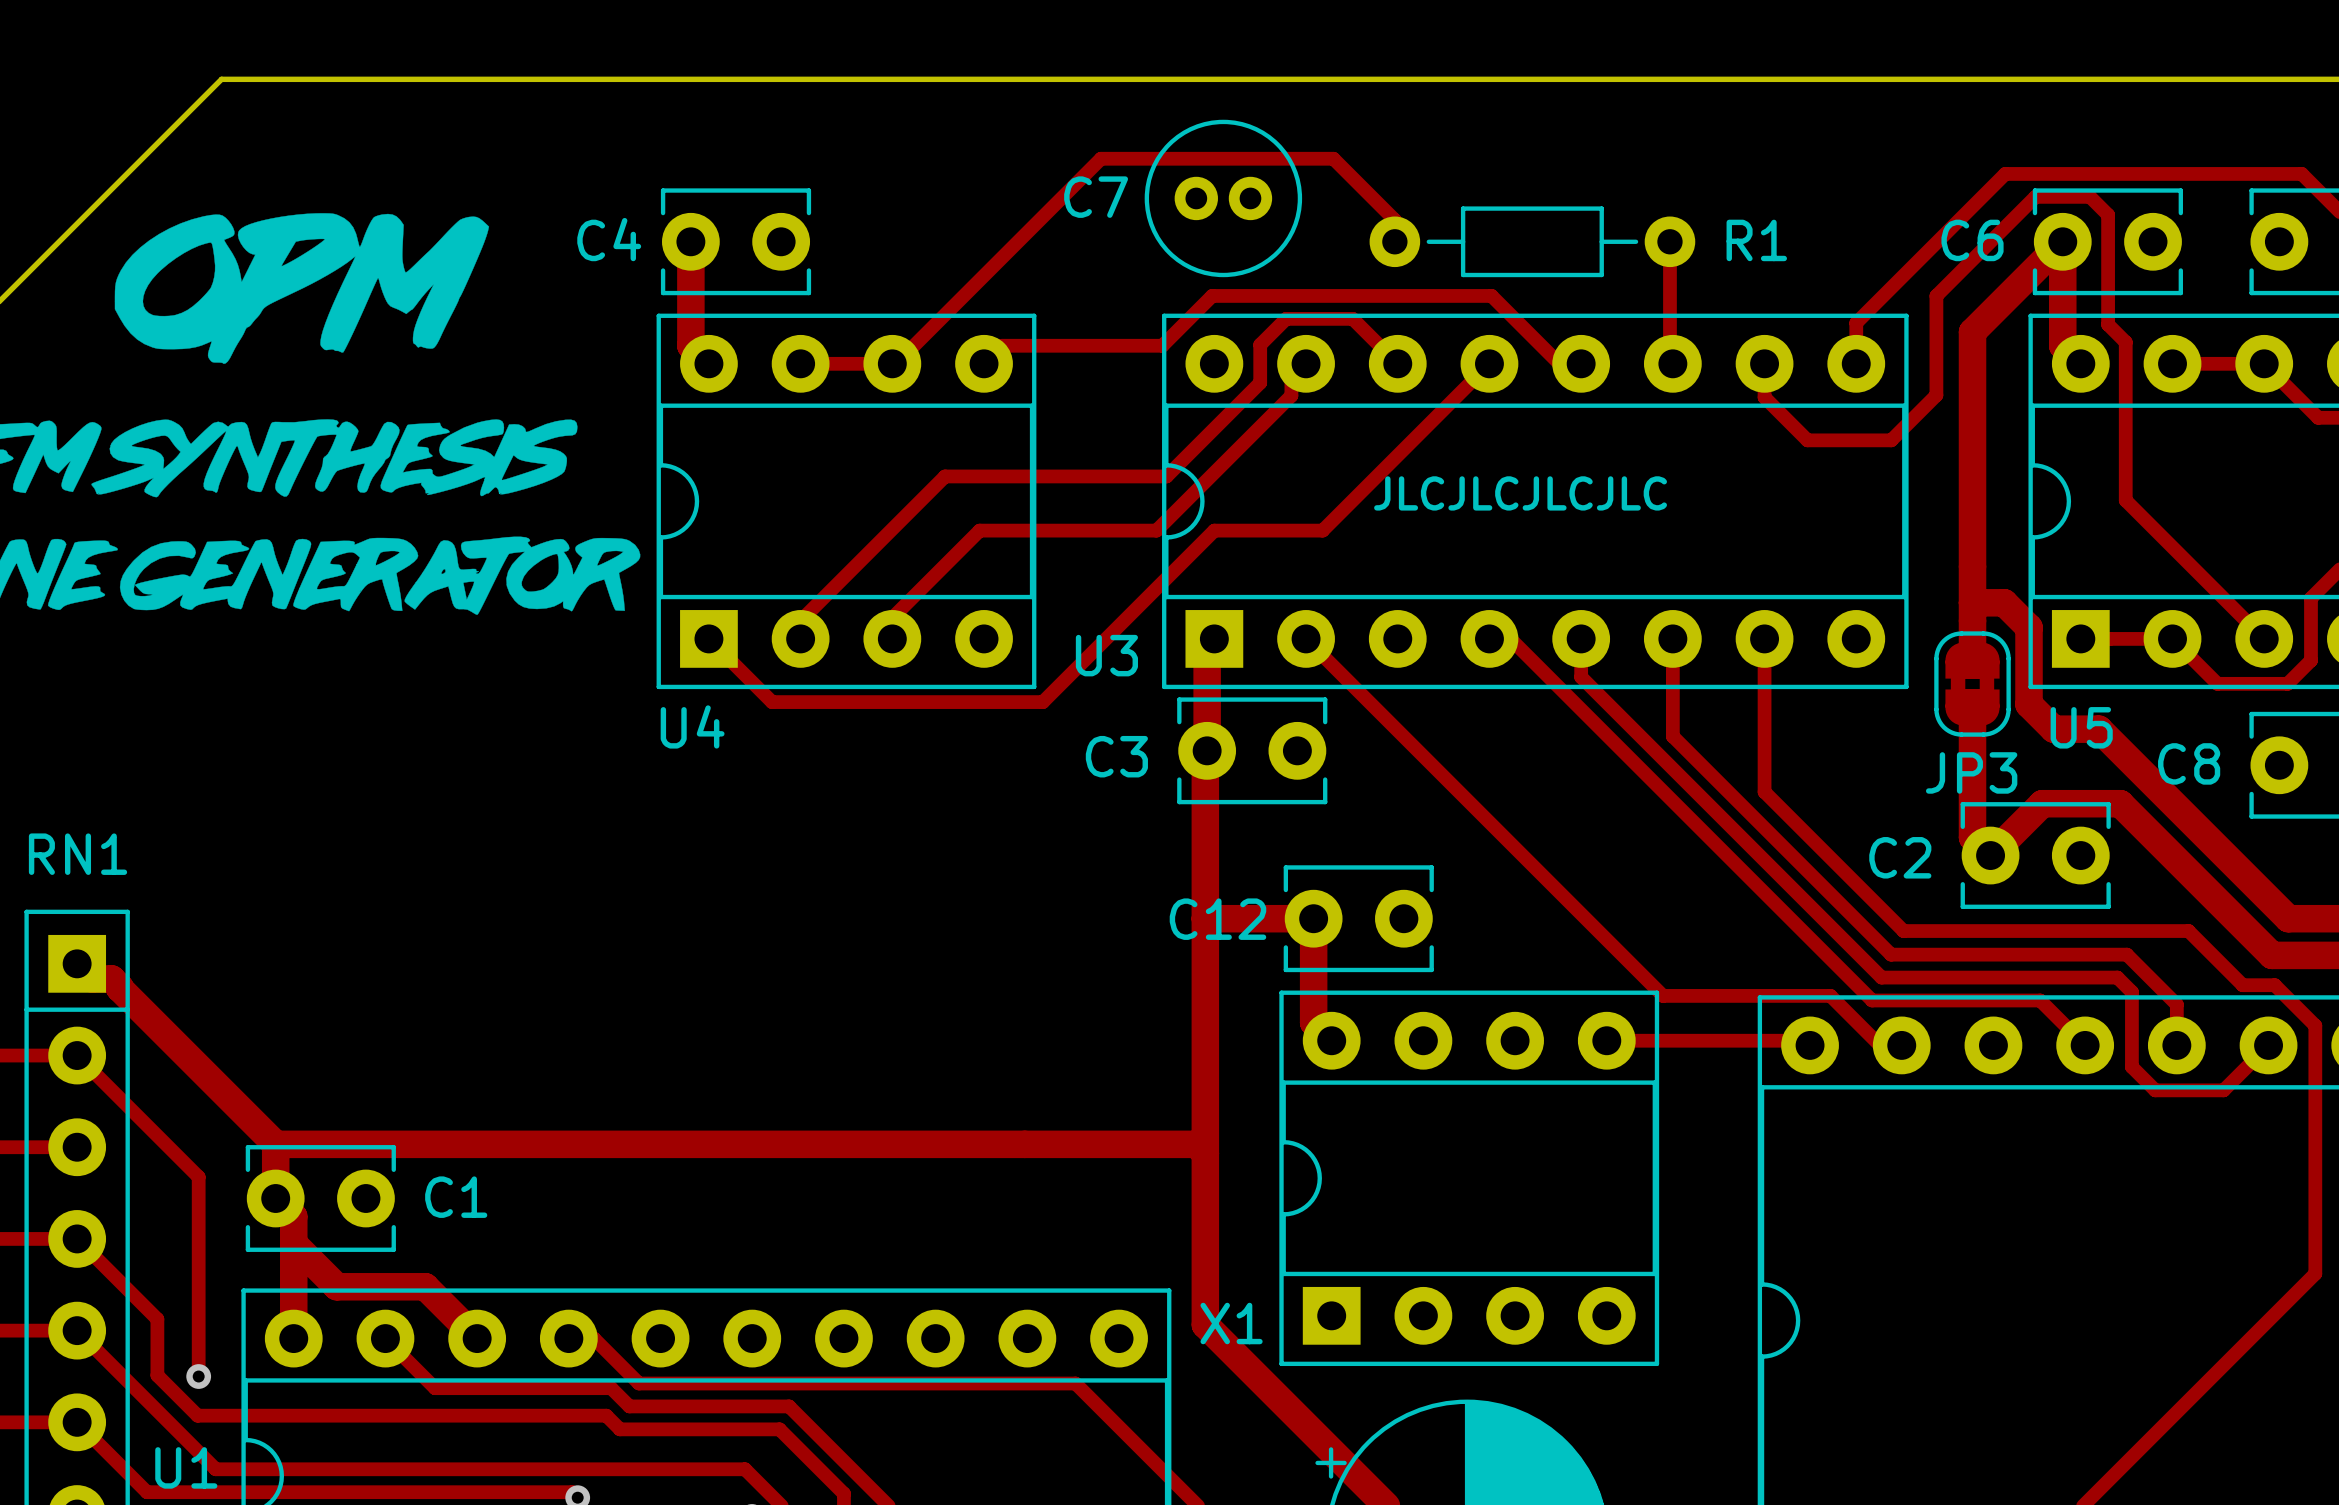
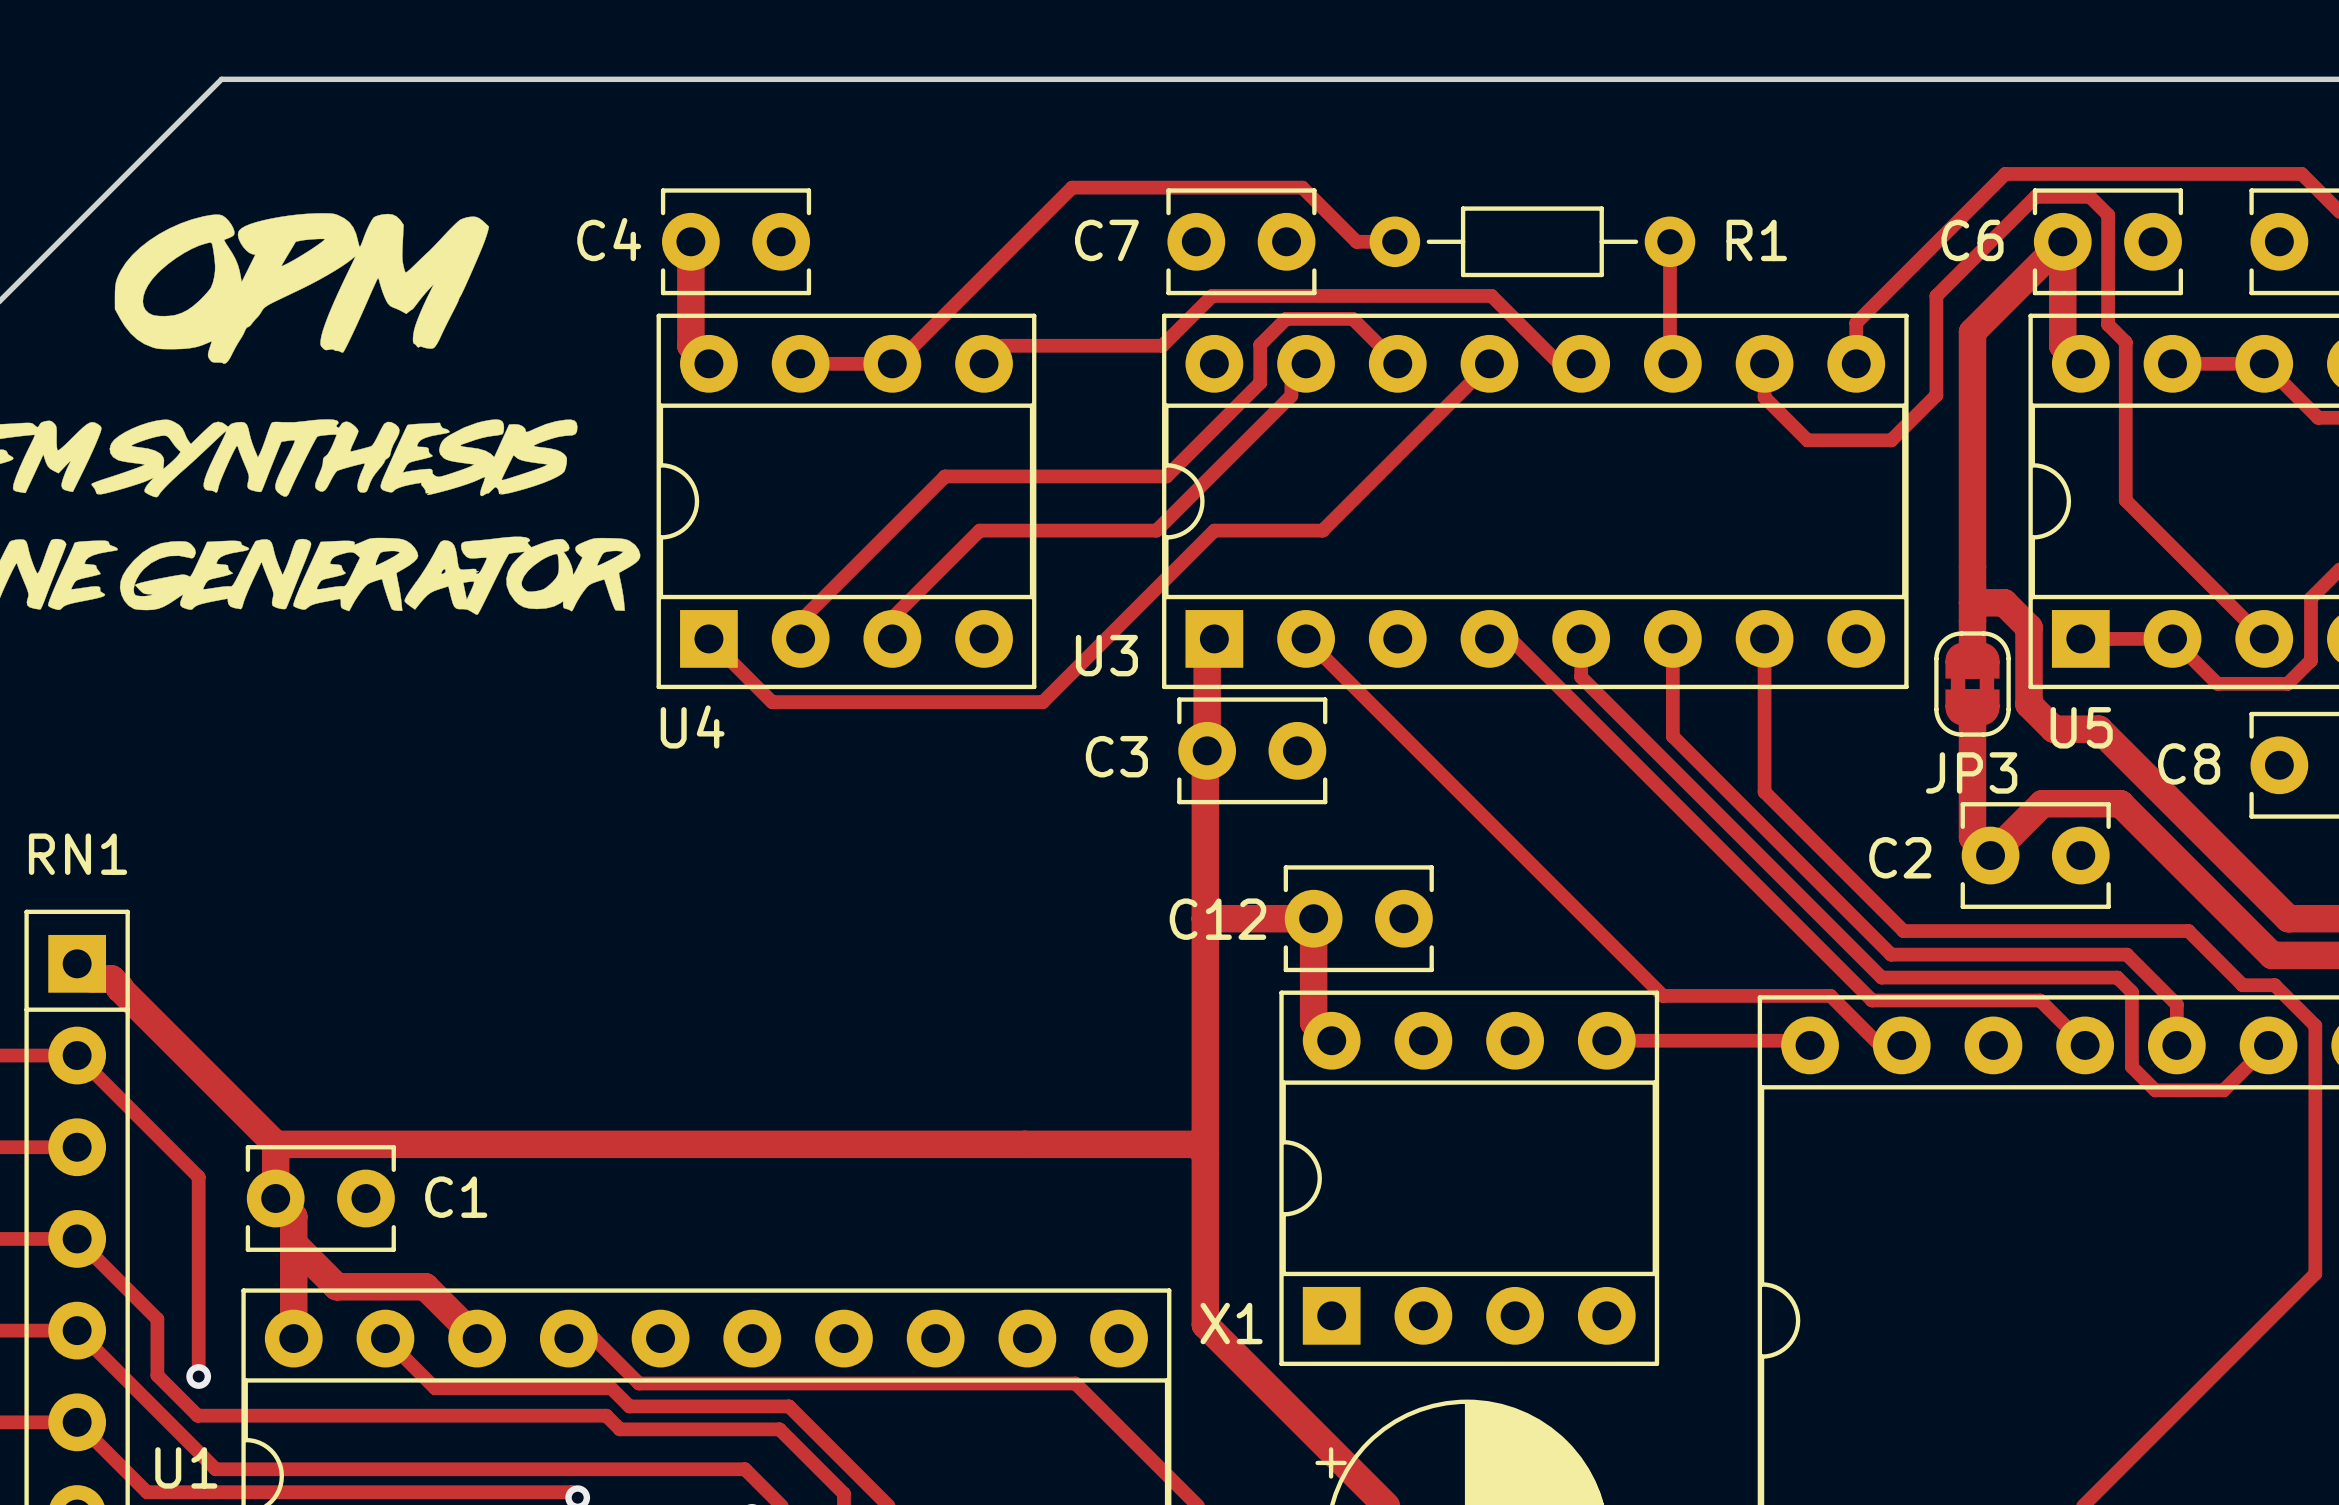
C7 footprint: [1144, 119, 1303, 278] -> [1166, 188, 1317, 296]
track: (1072, 187) (1101, 158) (1333, 158) (1394, 220) (1394, 241) -> (1072, 187) (1302, 187) (1356, 241) (1394, 241)
text: JLCJLCJLCJLC (1520, 493) -> none

